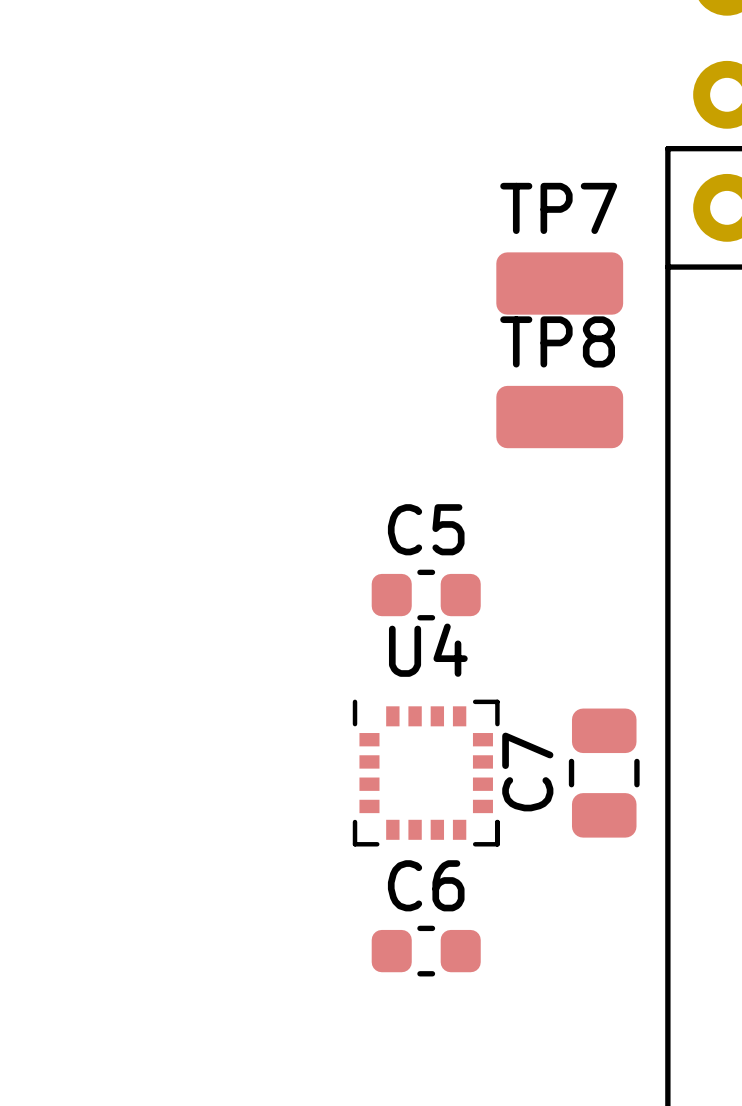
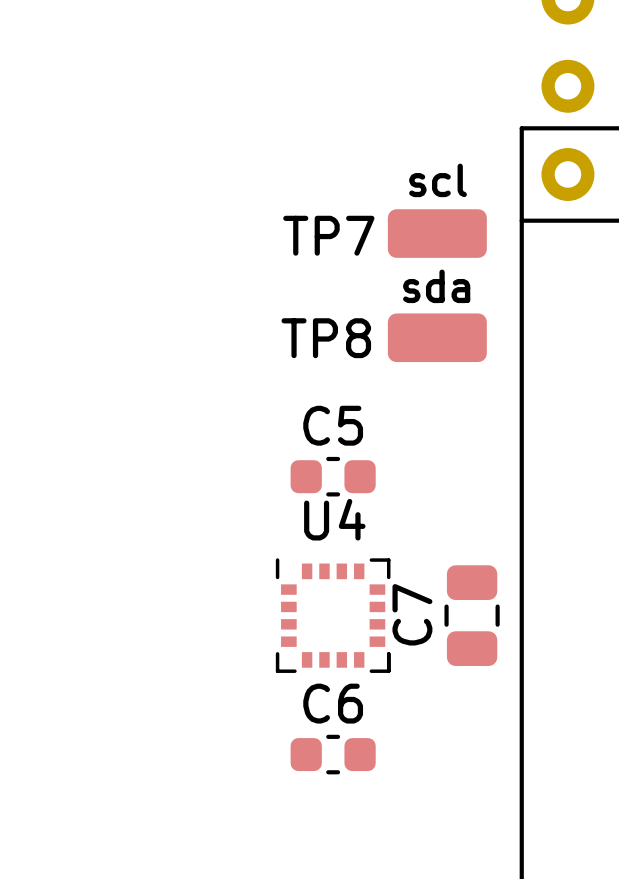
TP7 name position: TP7 (558, 208) -> TP7 (328, 235)
text: none -> scl (438, 180)
TP8 name position: TP8 (557, 341) -> TP8 (326, 338)
text: none -> sda (436, 286)

